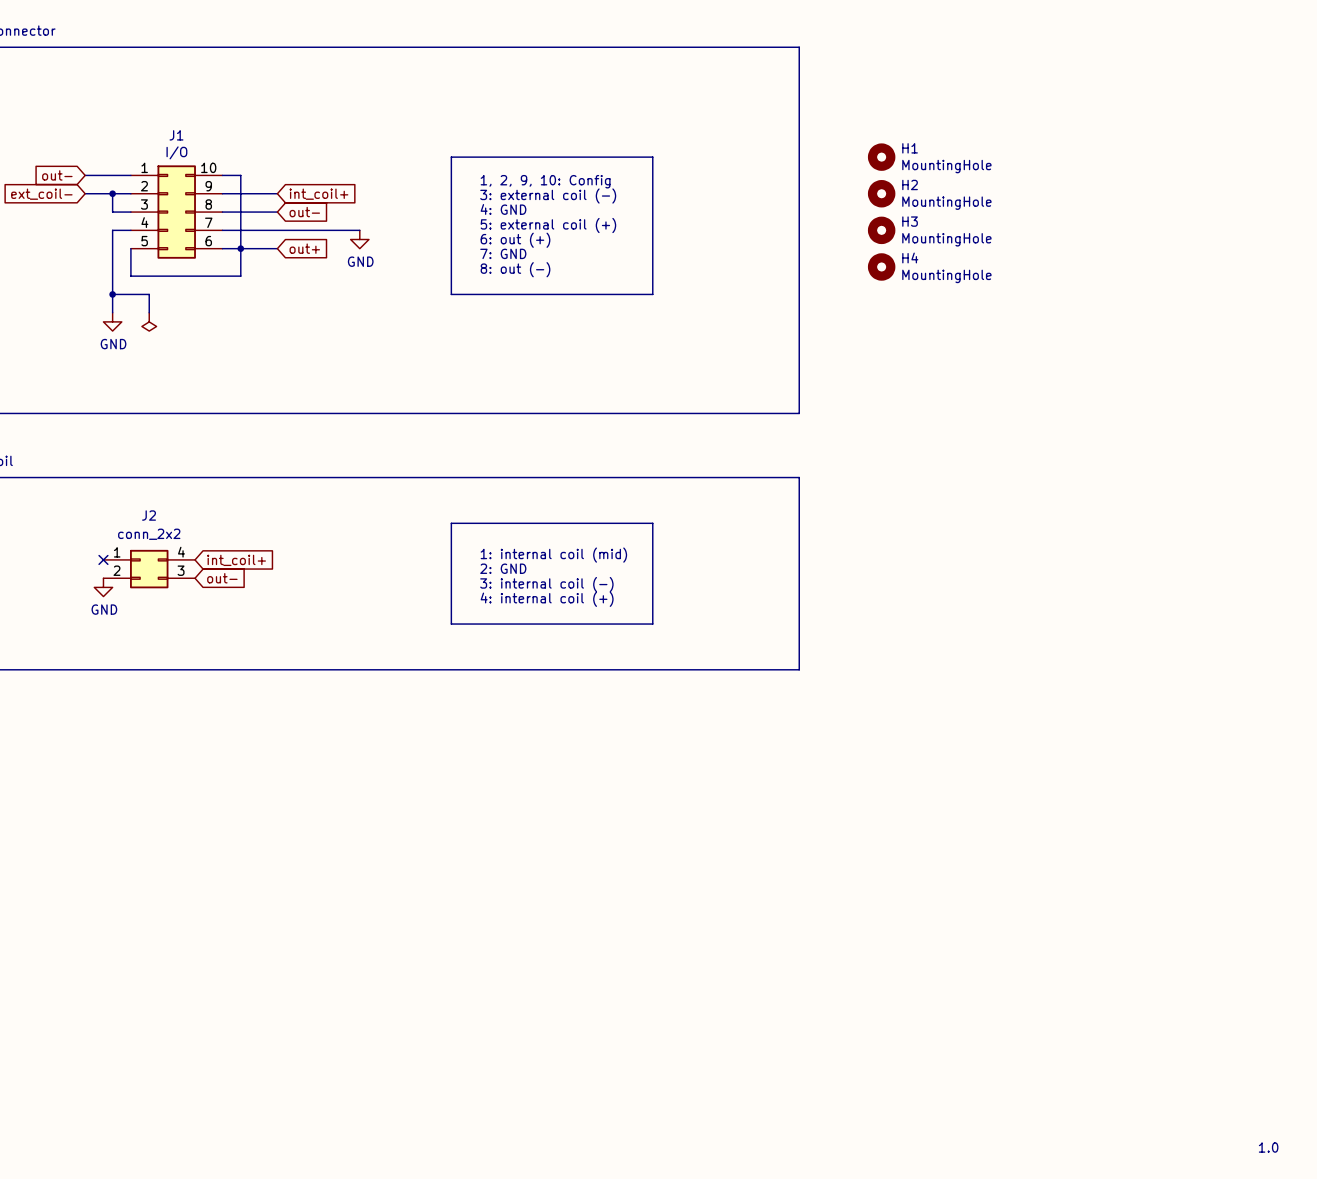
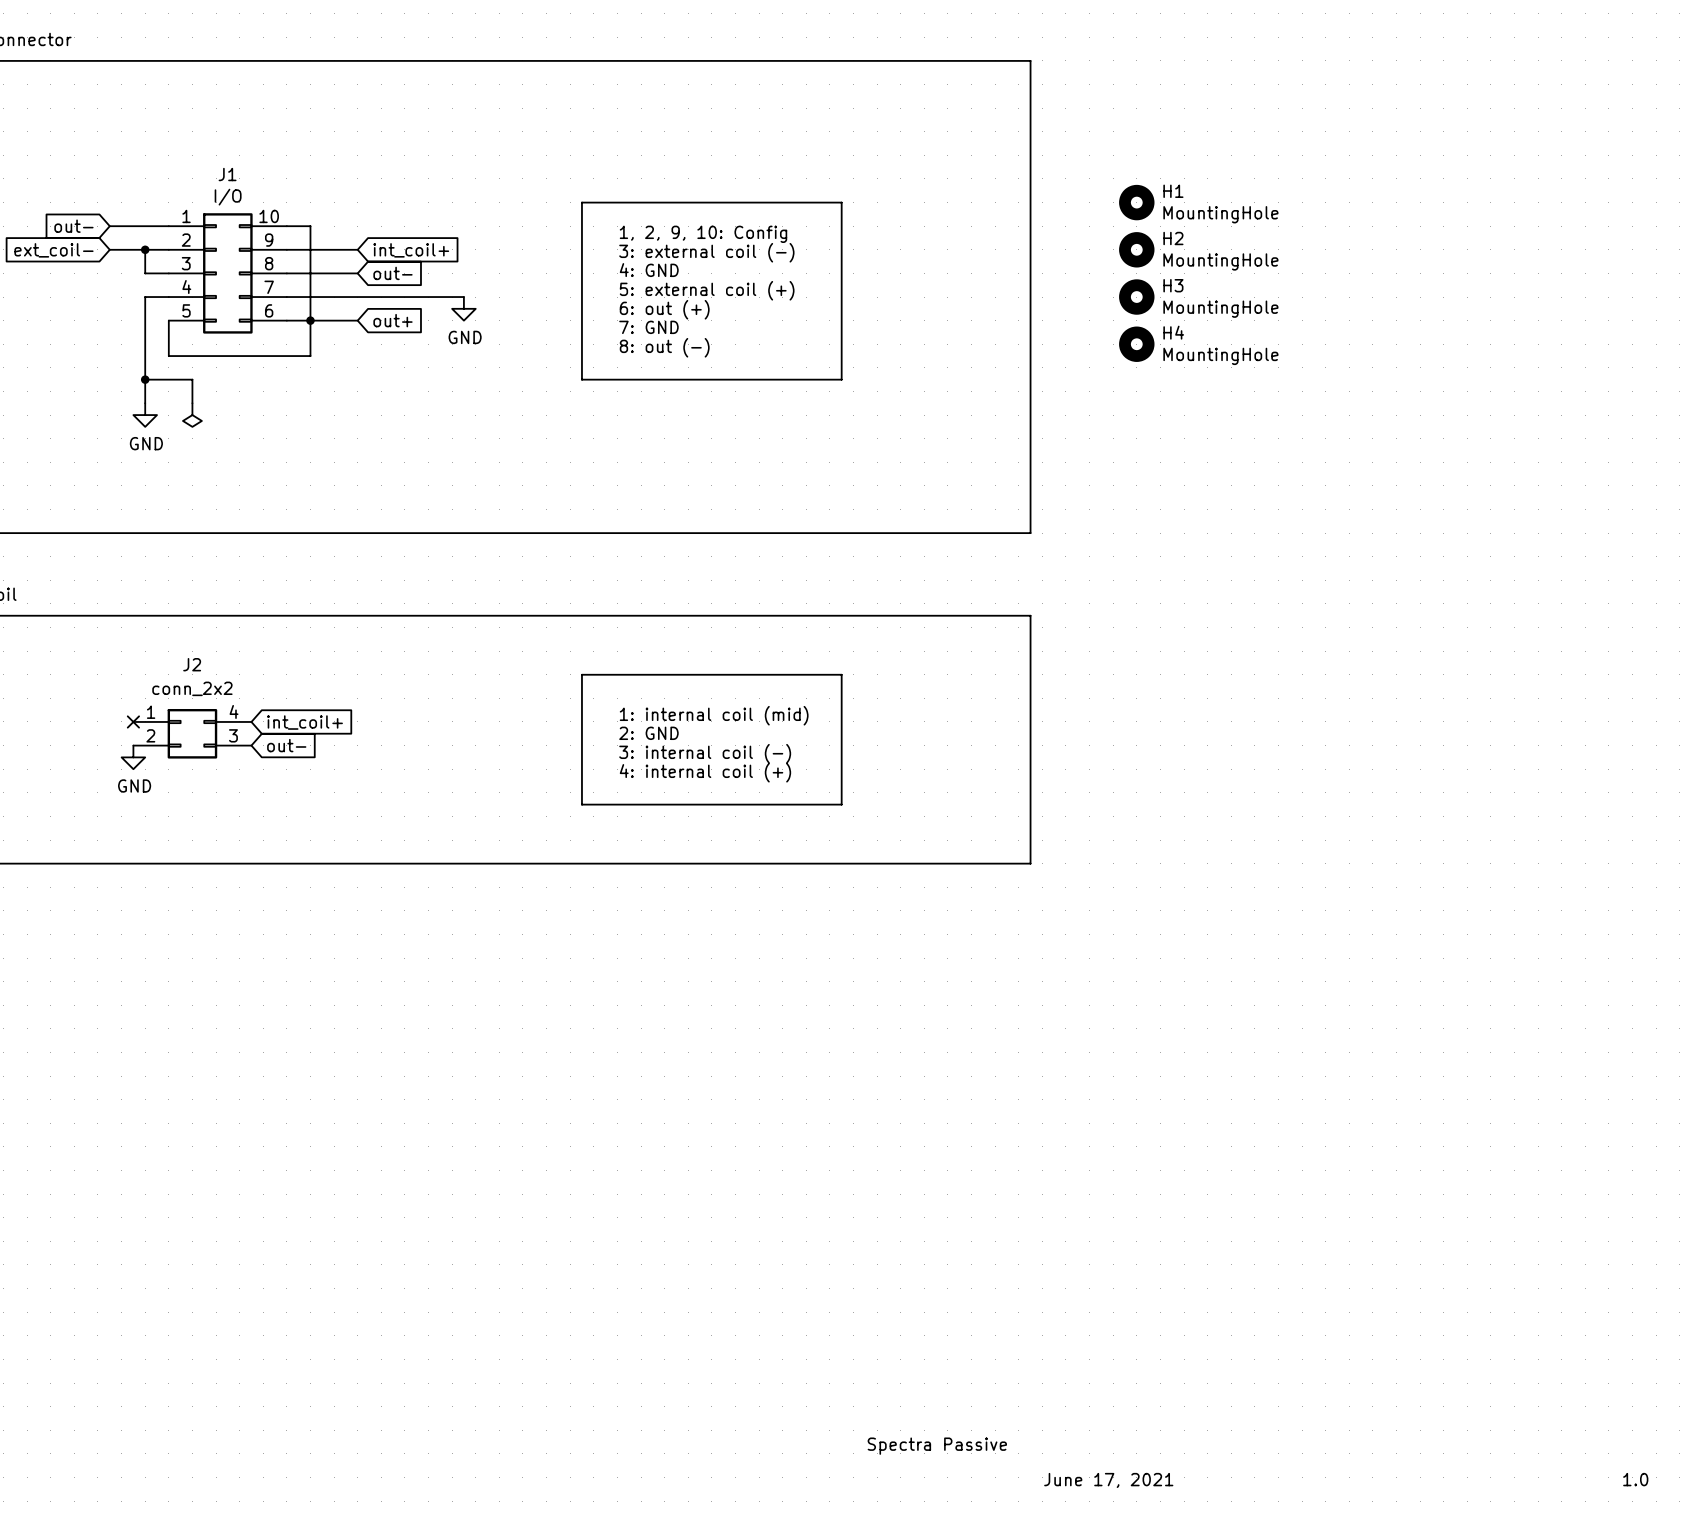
text: none -> Spectra Passive (937, 1446)
text: none -> June 17, 2021 (1108, 1480)

